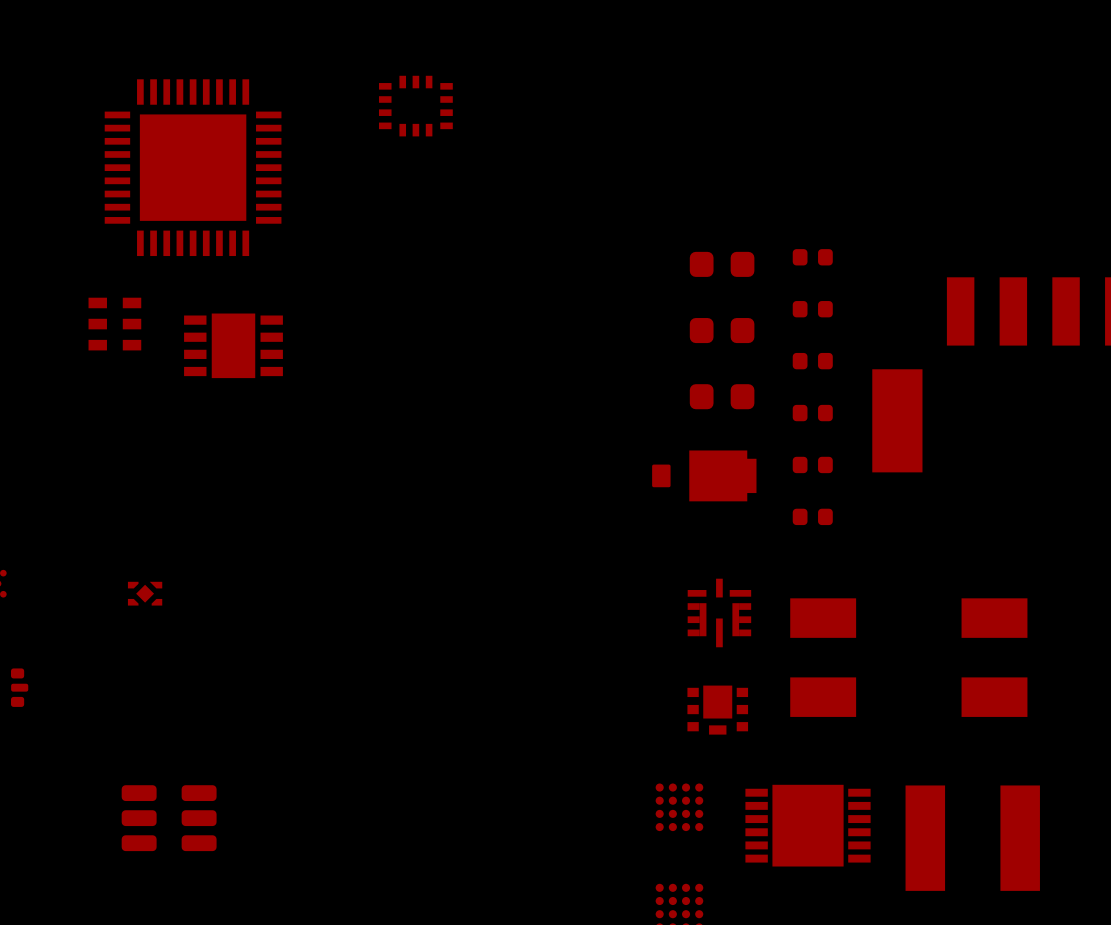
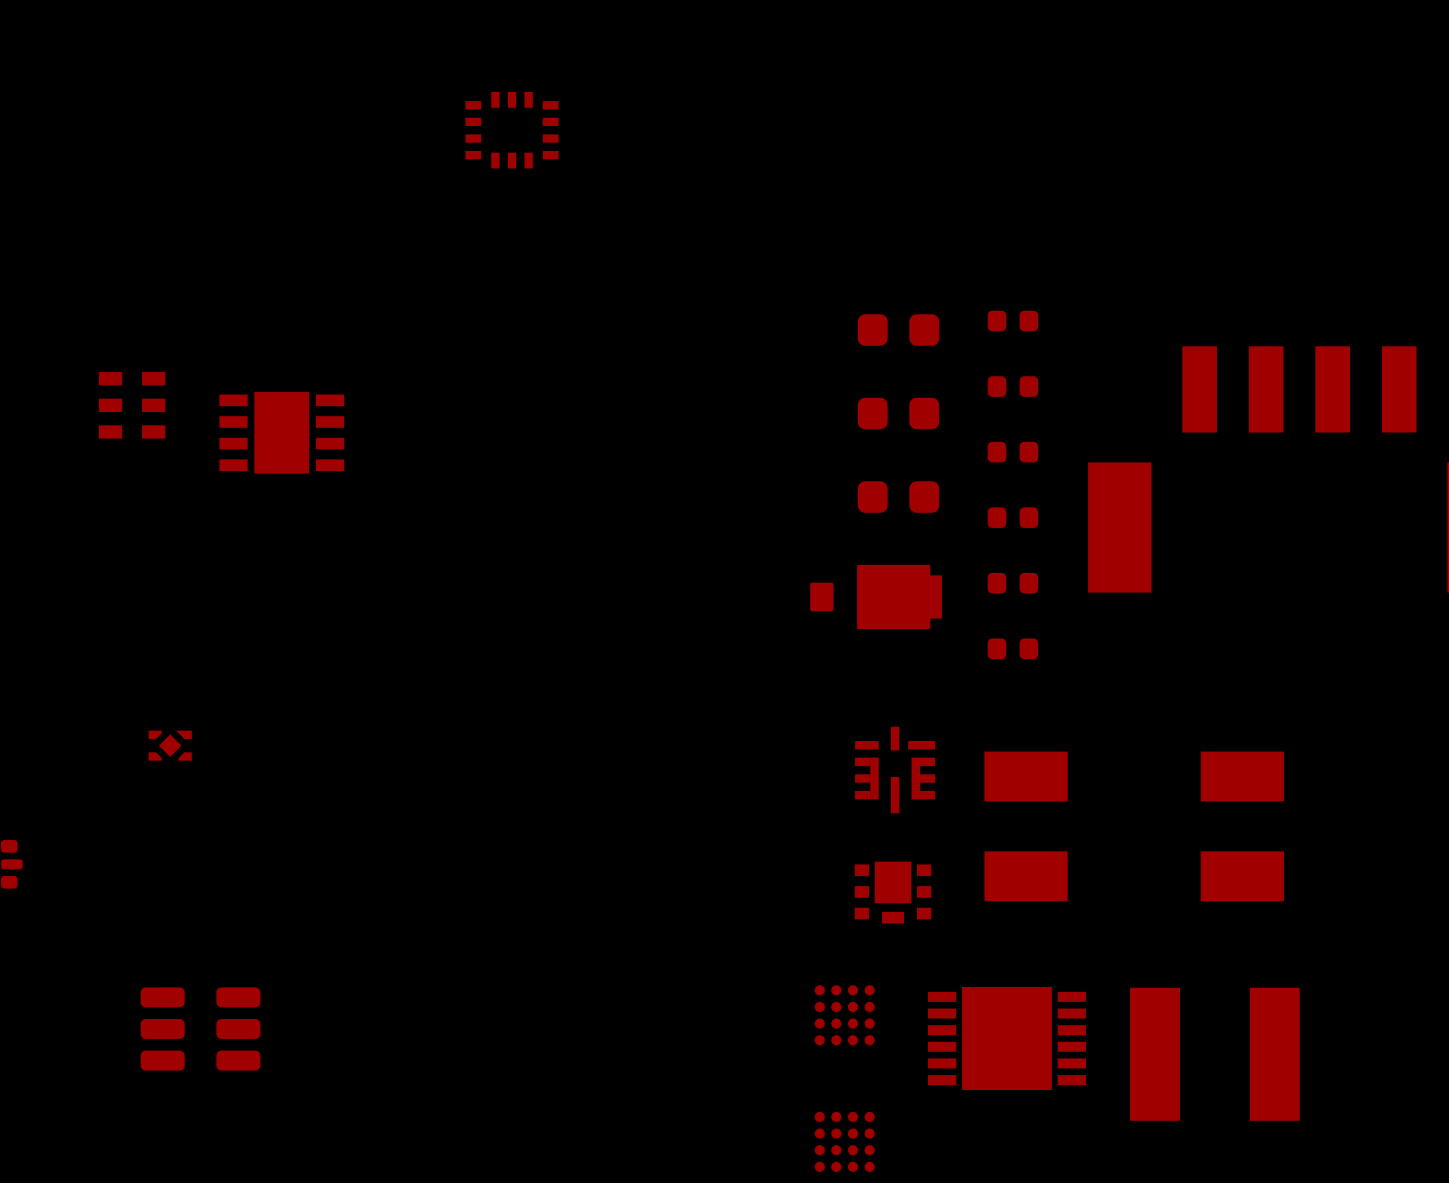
part: (193, 167) -> none

